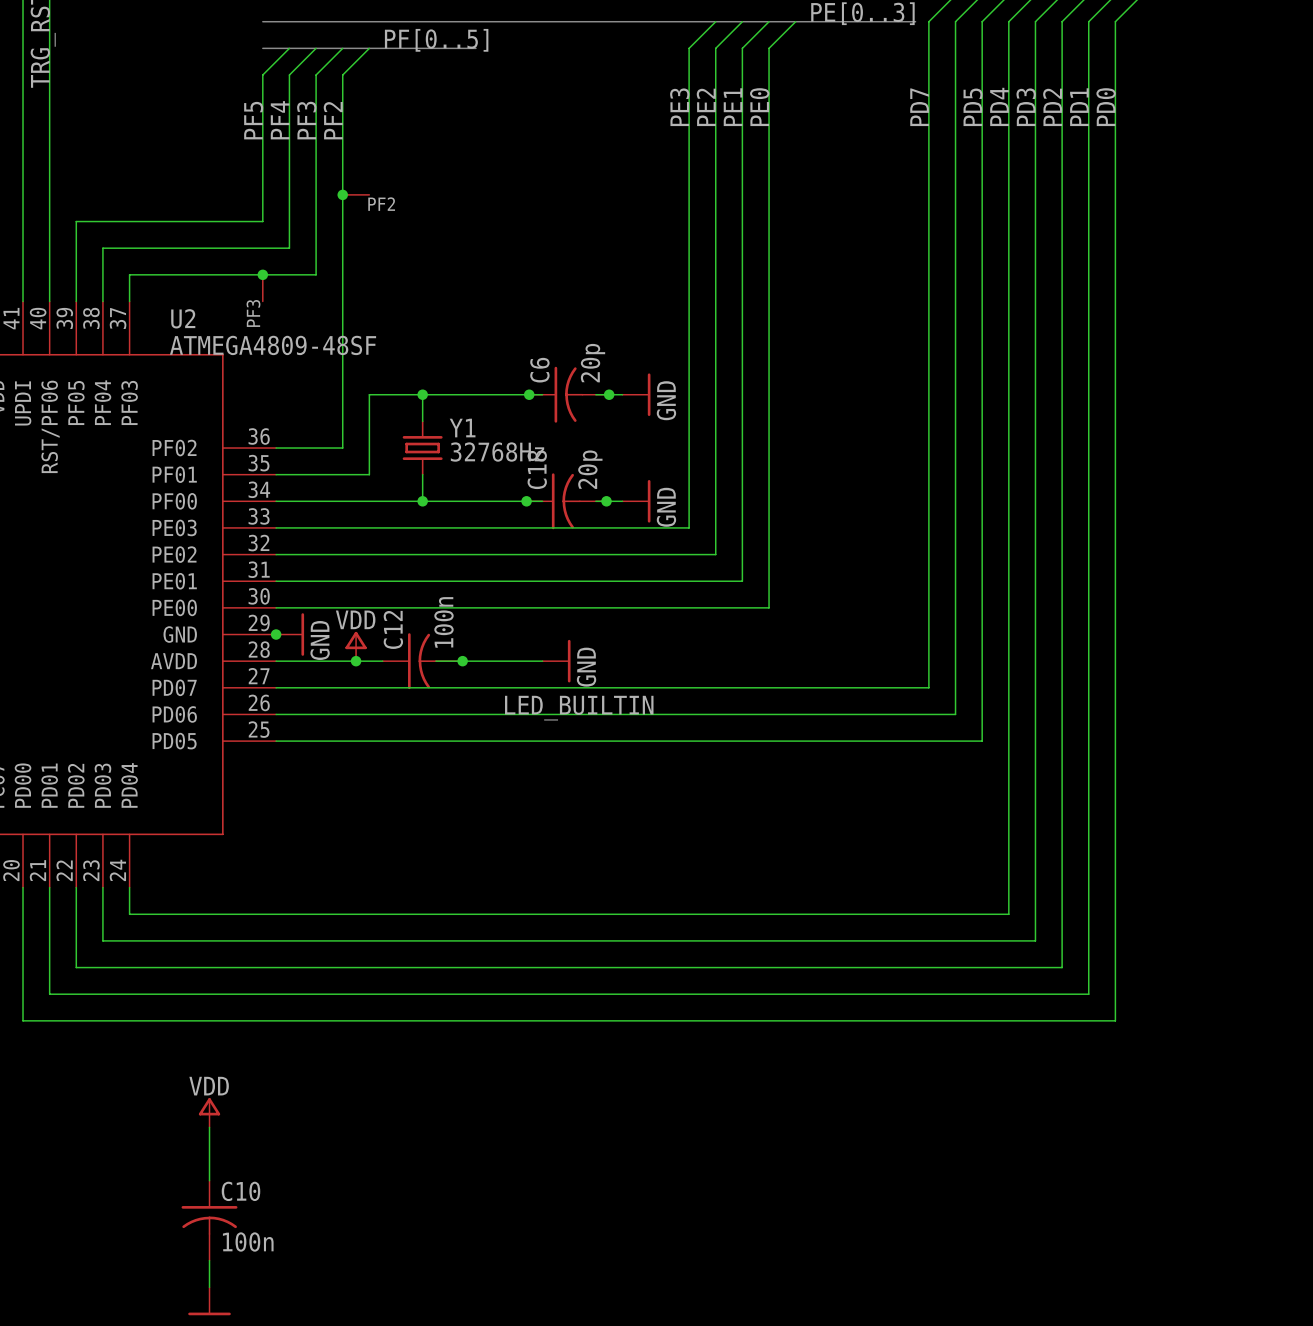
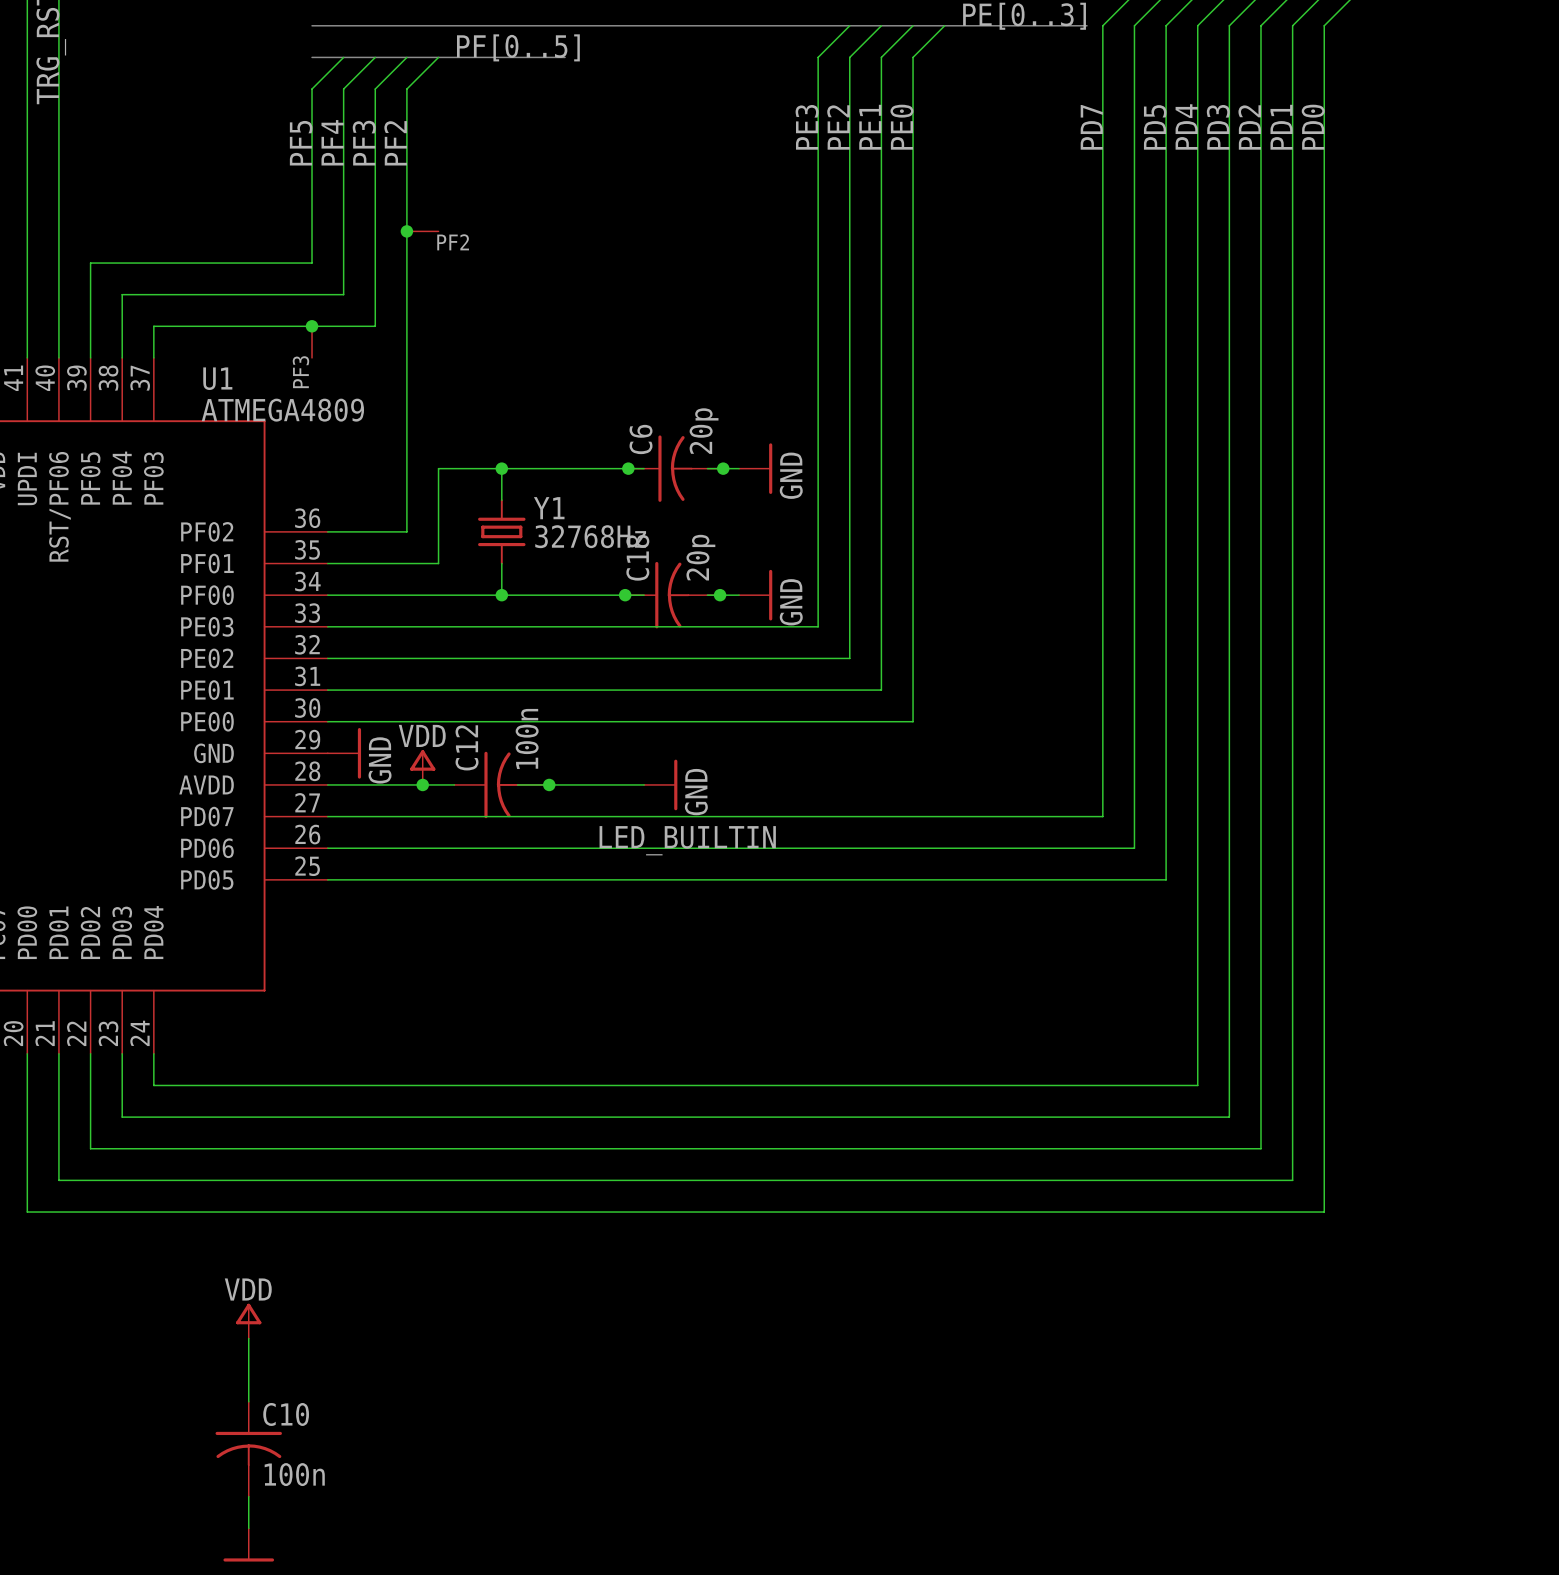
U2 name: U2 (183, 318) -> U1 (217, 378)
U2 value: ATMEGA4809-48SF (273, 345) -> ATMEGA4809 (282, 410)
junction: (276, 634) -> none

